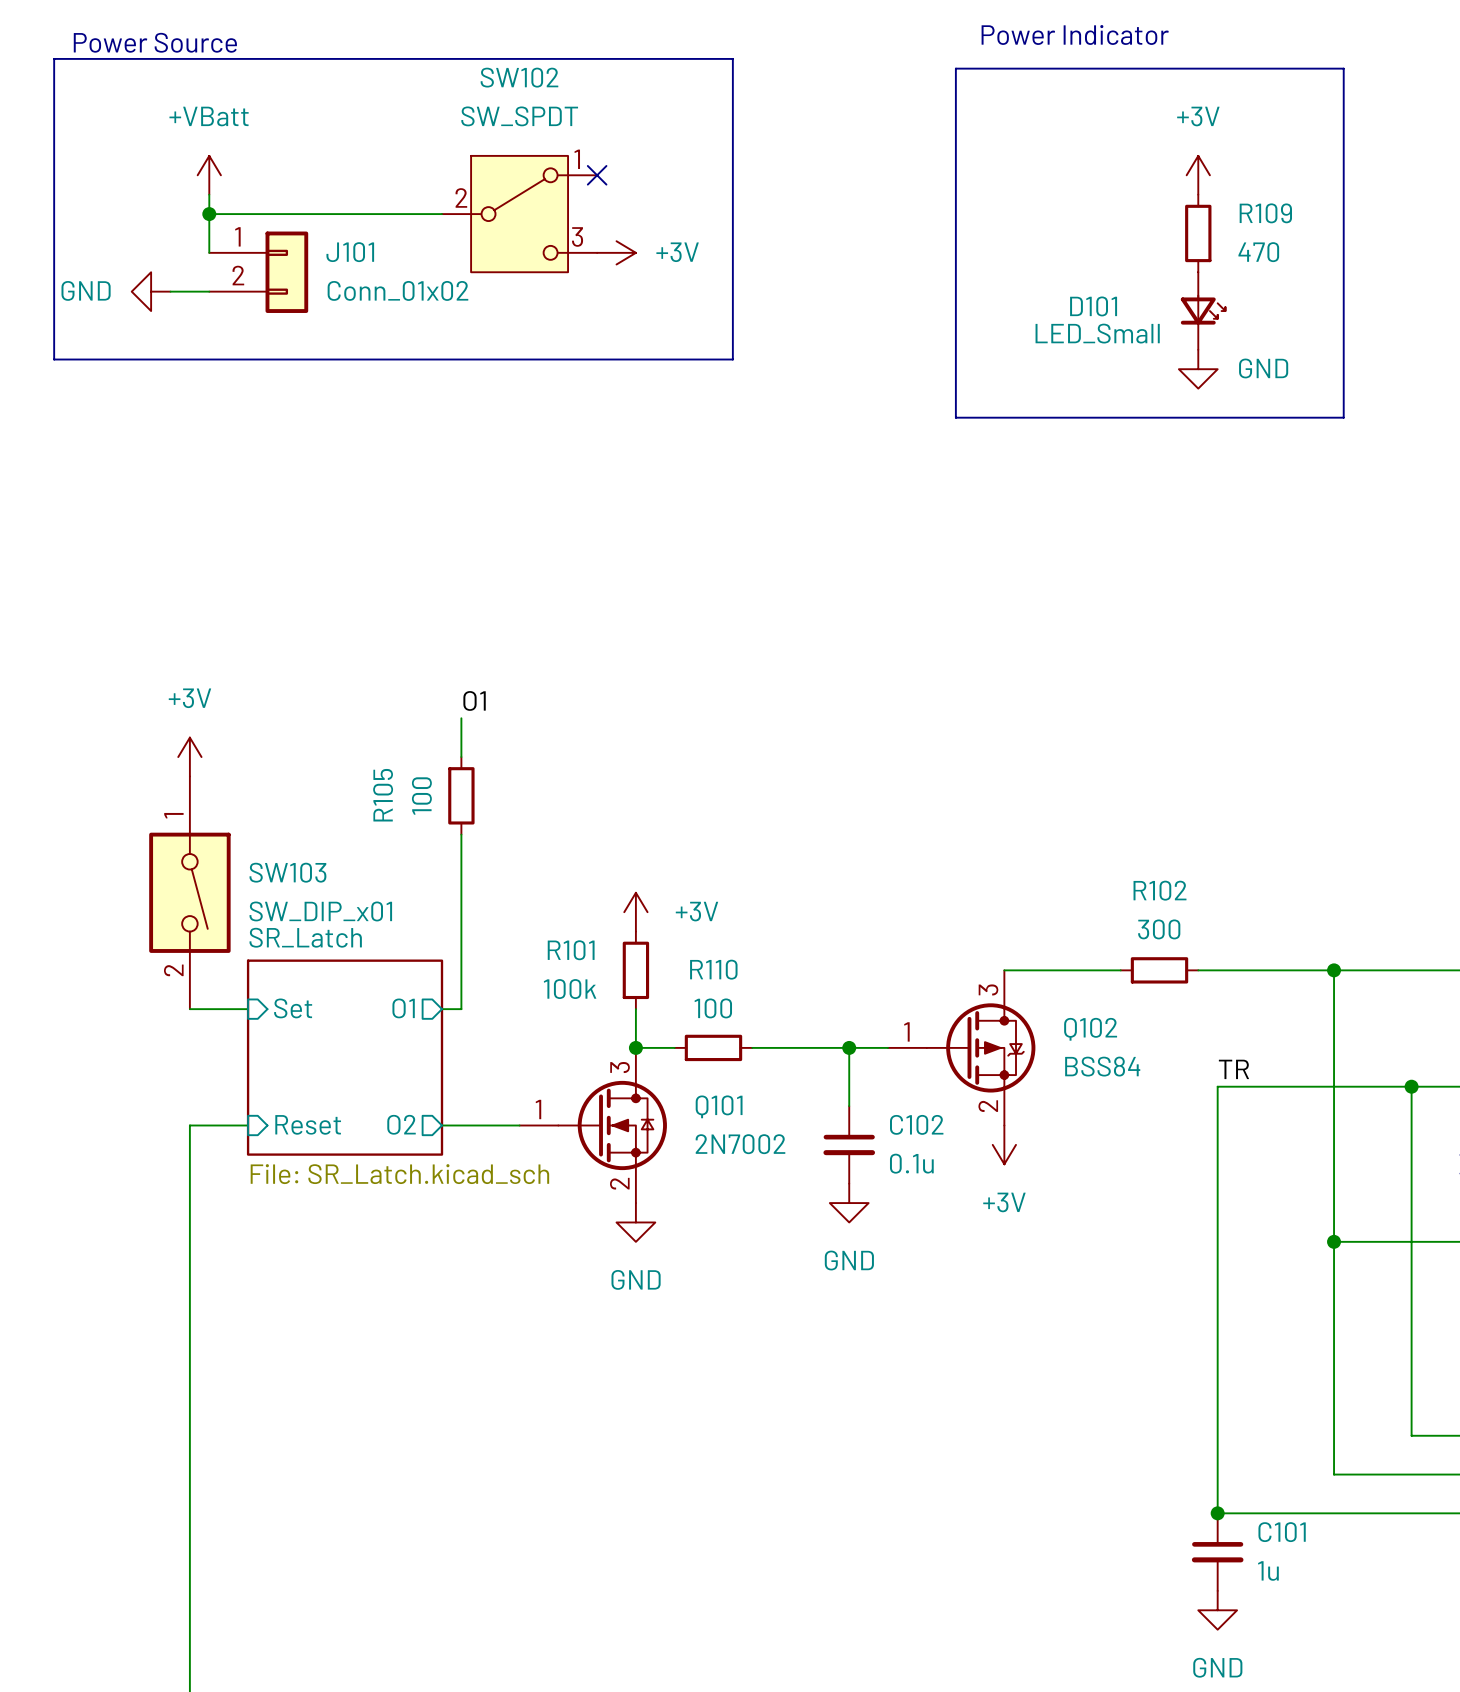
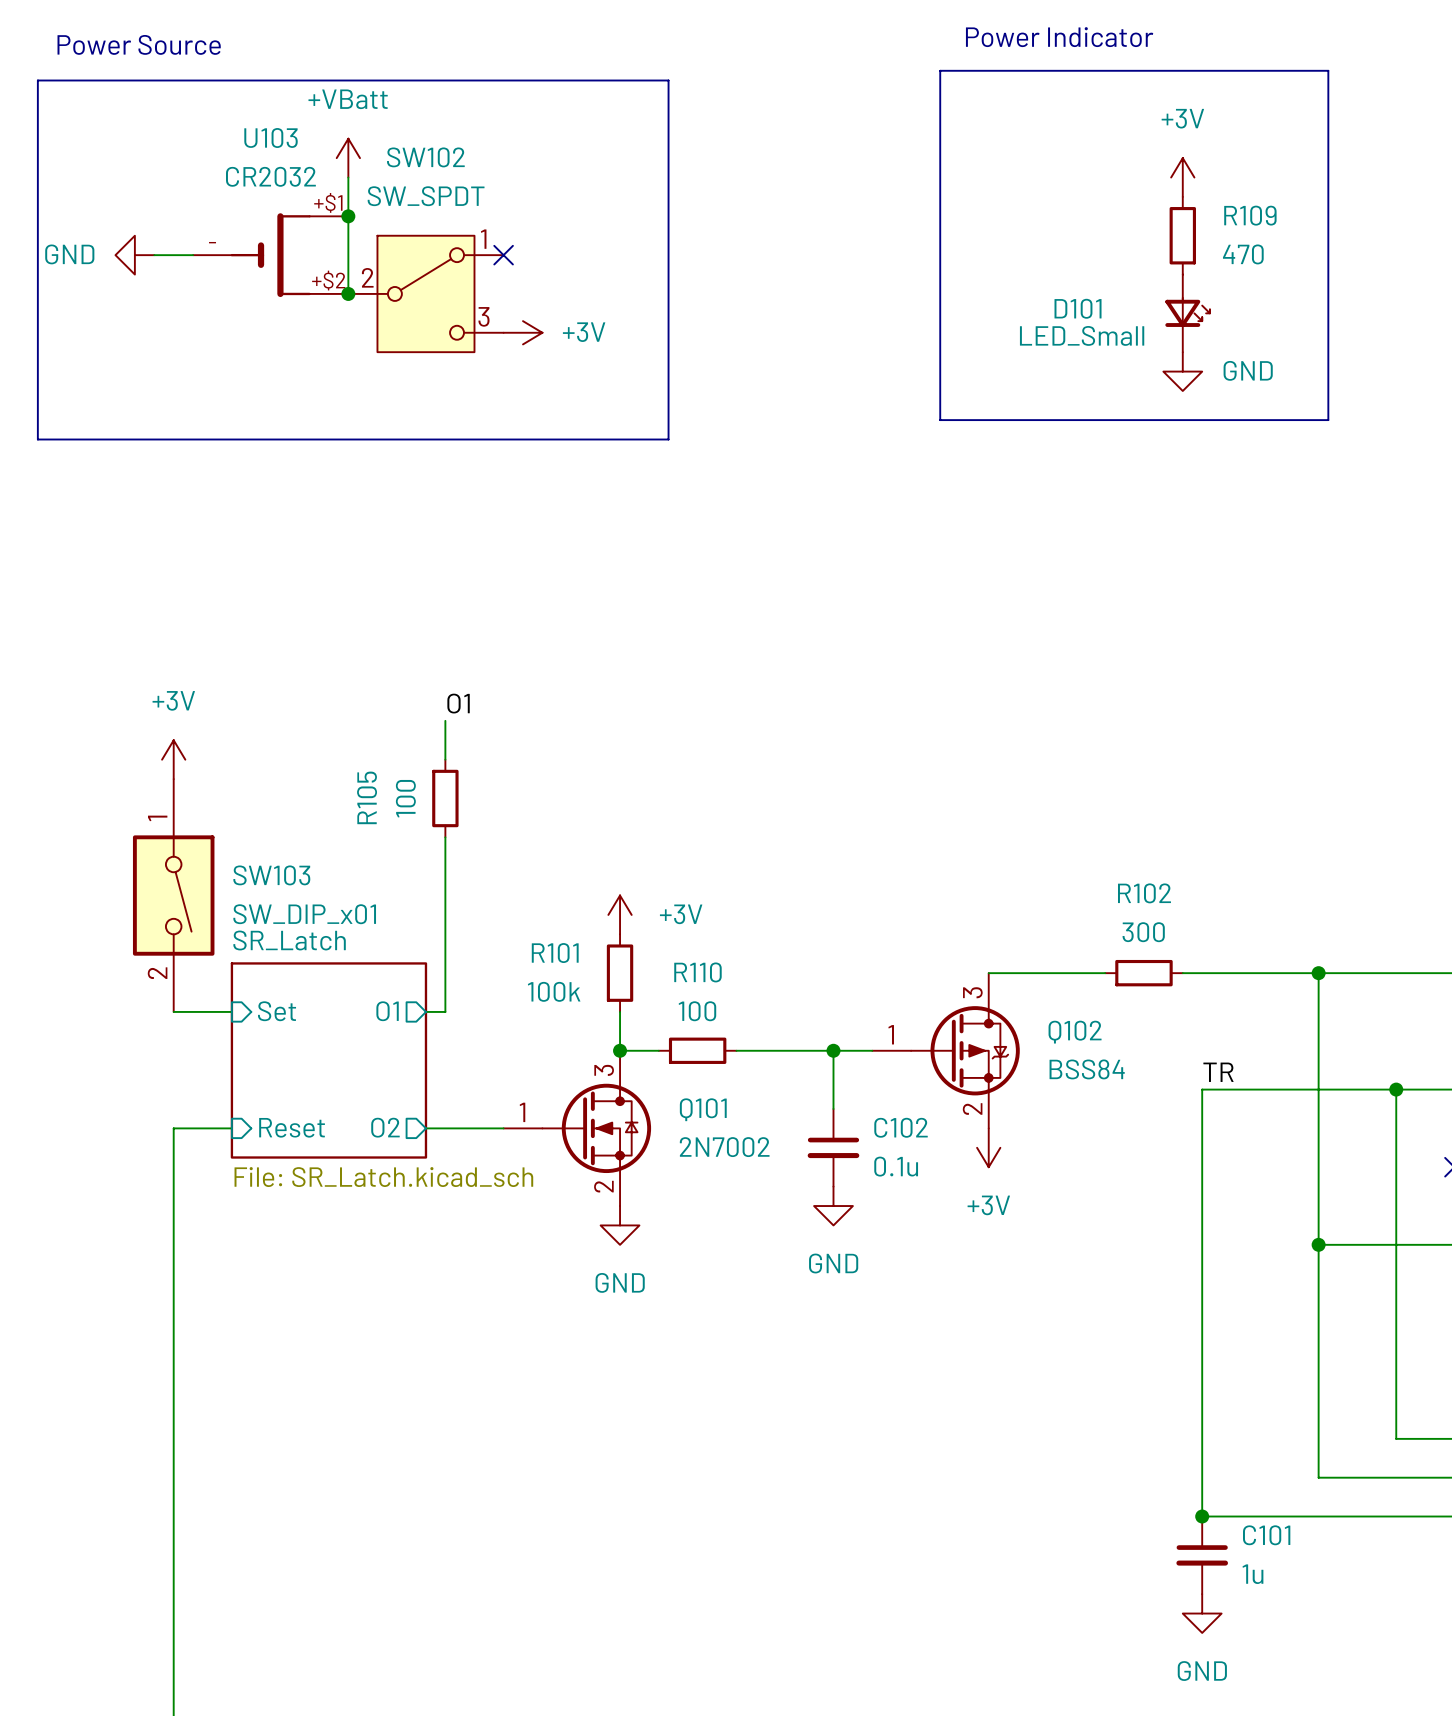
line: (54, 78) (54, 58) (732, 58) (732, 359) (54, 359) -> (37, 80) (668, 80) (668, 439) (37, 439) (37, 361)
power symbol position: +VBatt (209, 175) -> +VBatt (348, 158)
wire: none -> (348, 177) (348, 293)
no-connect mark: (597, 175) -> none
wire: (209, 194) (209, 252) -> (154, 255) (193, 255)
wire: (209, 214) (442, 214) -> none
junction: (209, 214) -> none
junction: none -> (348, 216)
SW102 position: (519, 214) -> (425, 293)
U103: none -> CR2032 (270, 255)
no-connect mark: none -> (503, 255)
power symbol position: +3V (616, 252) -> +3V (523, 332)
J101: Conn_01x02 (258, 272) -> none
power symbol position: GND (151, 291) -> GND (134, 255)
wire: (170, 291) (209, 291) -> none
junction: none -> (348, 293)

